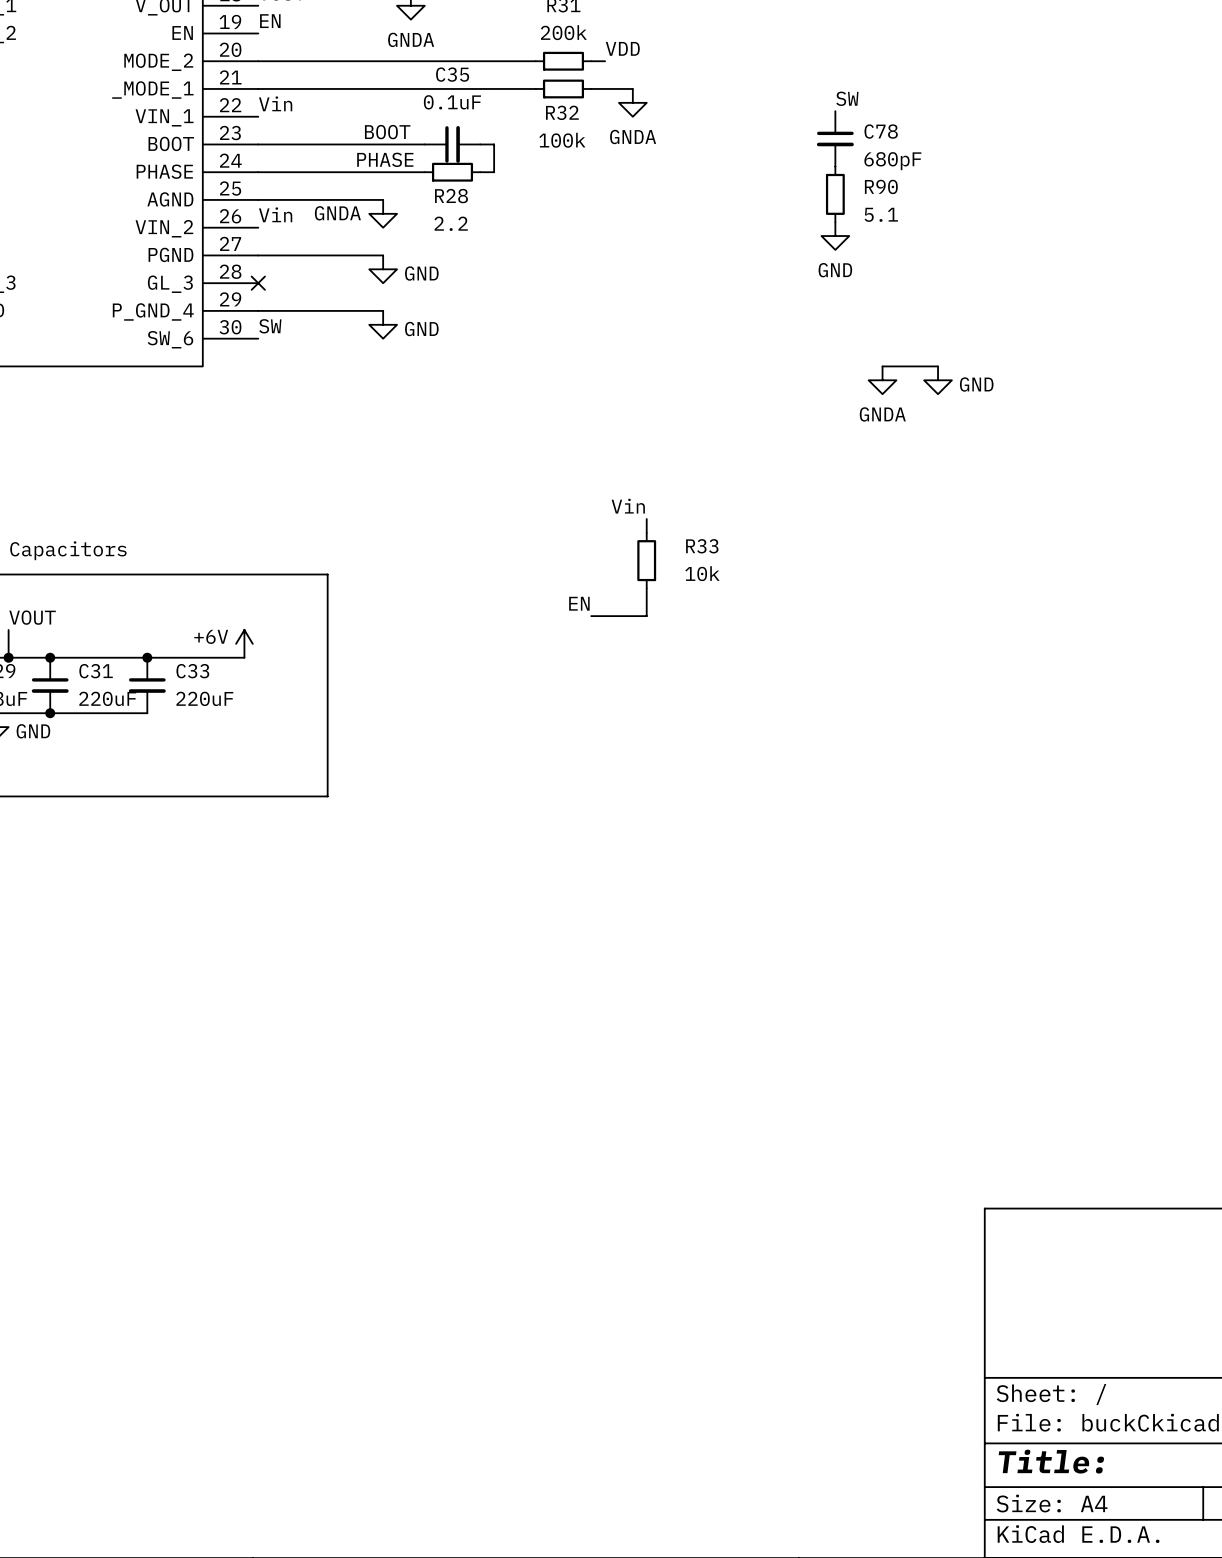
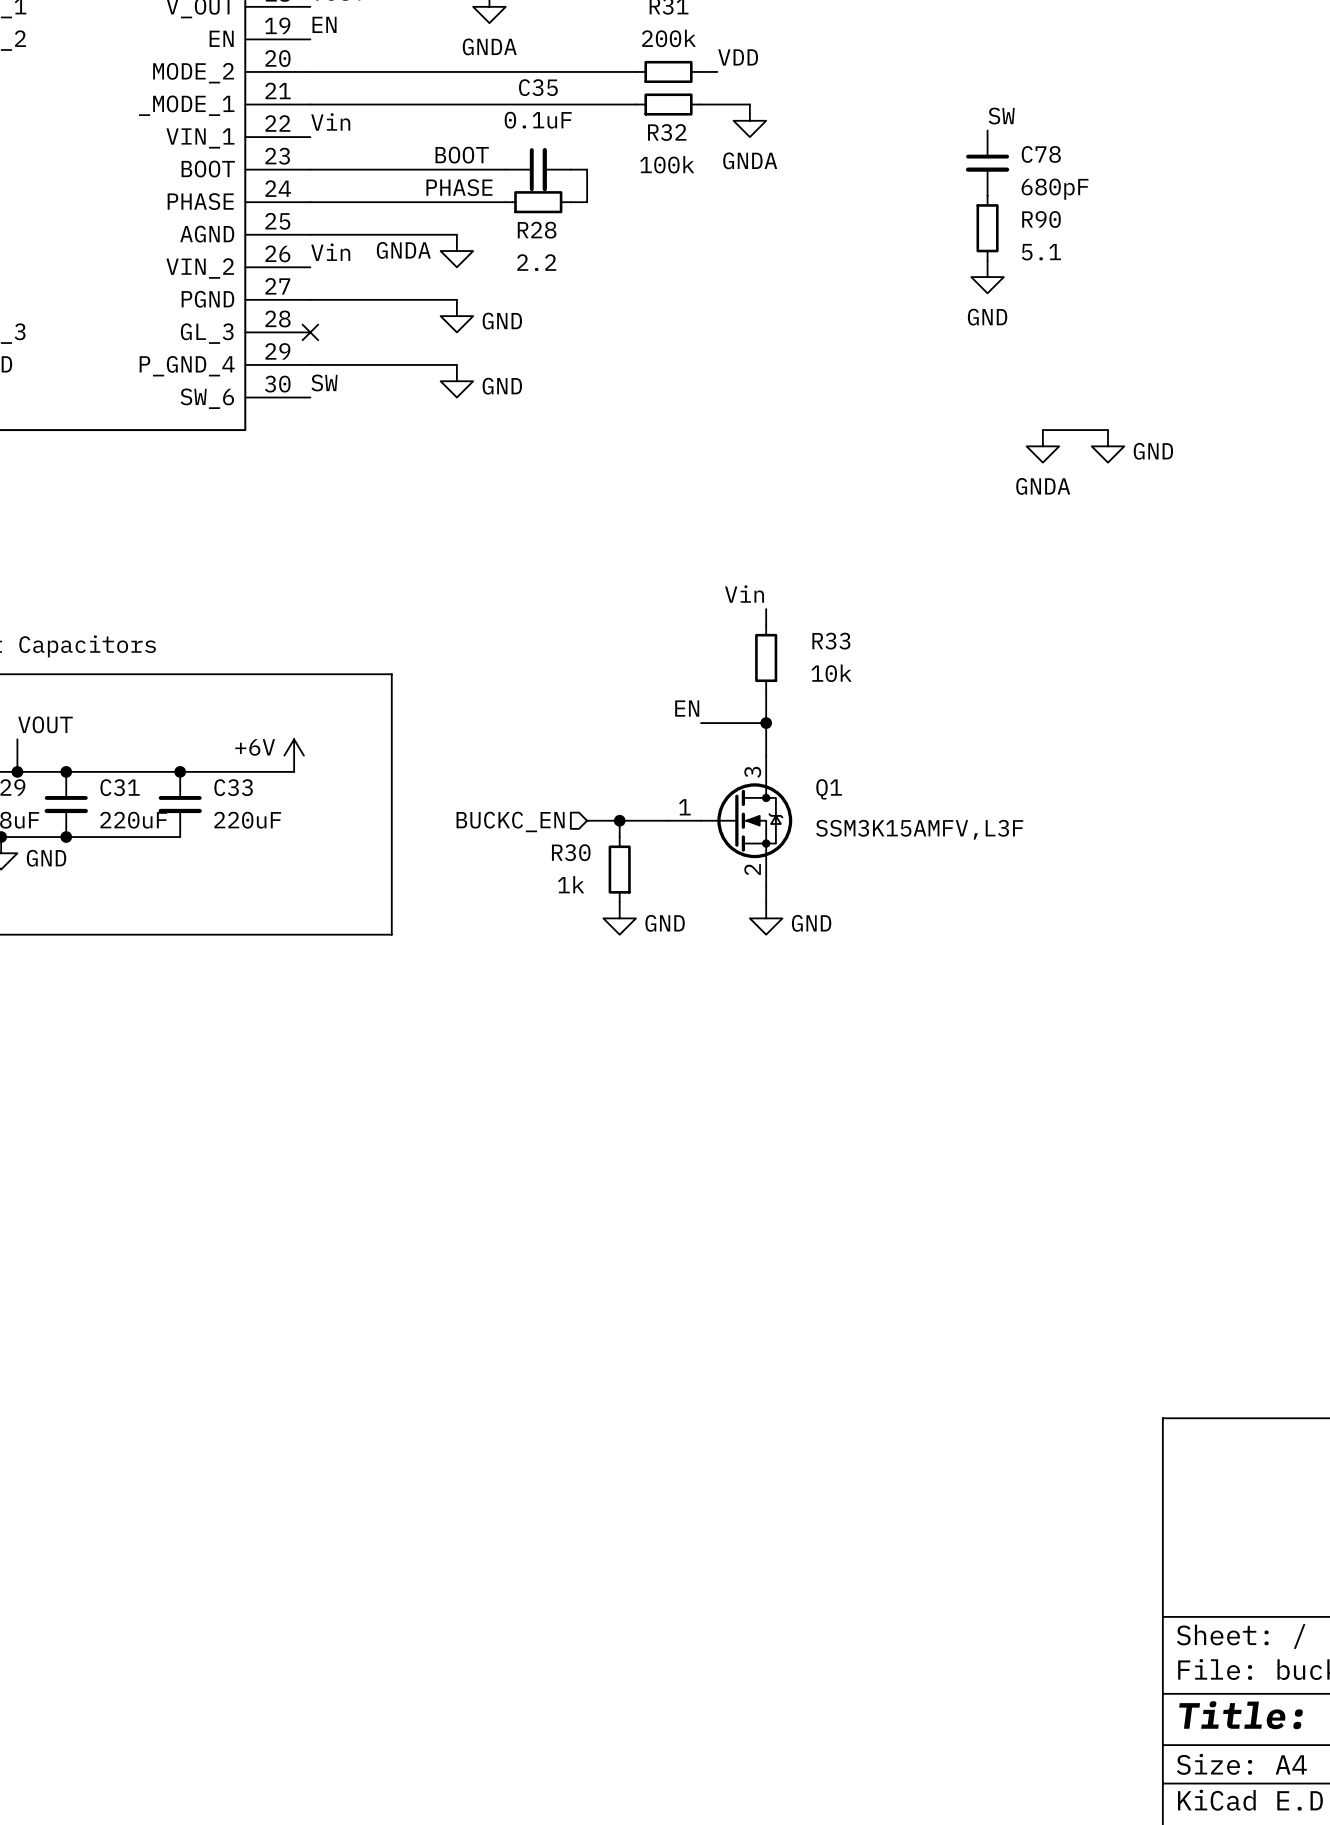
wire: none -> (766, 723) (766, 755)
junction: none -> (766, 723)
wire: none -> (587, 820) (668, 820)
wire: none -> (619, 820) (619, 837)
junction: none -> (619, 820)
Q1: none -> SSM3K15AMFV,L3F (730, 820)
hierarchical label: none -> BUCKC_EN (510, 821)
R30: none -> 1k (619, 869)
wire: none -> (766, 885) (766, 902)
power symbol: none -> GND (619, 918)
power symbol: none -> GND (766, 918)

